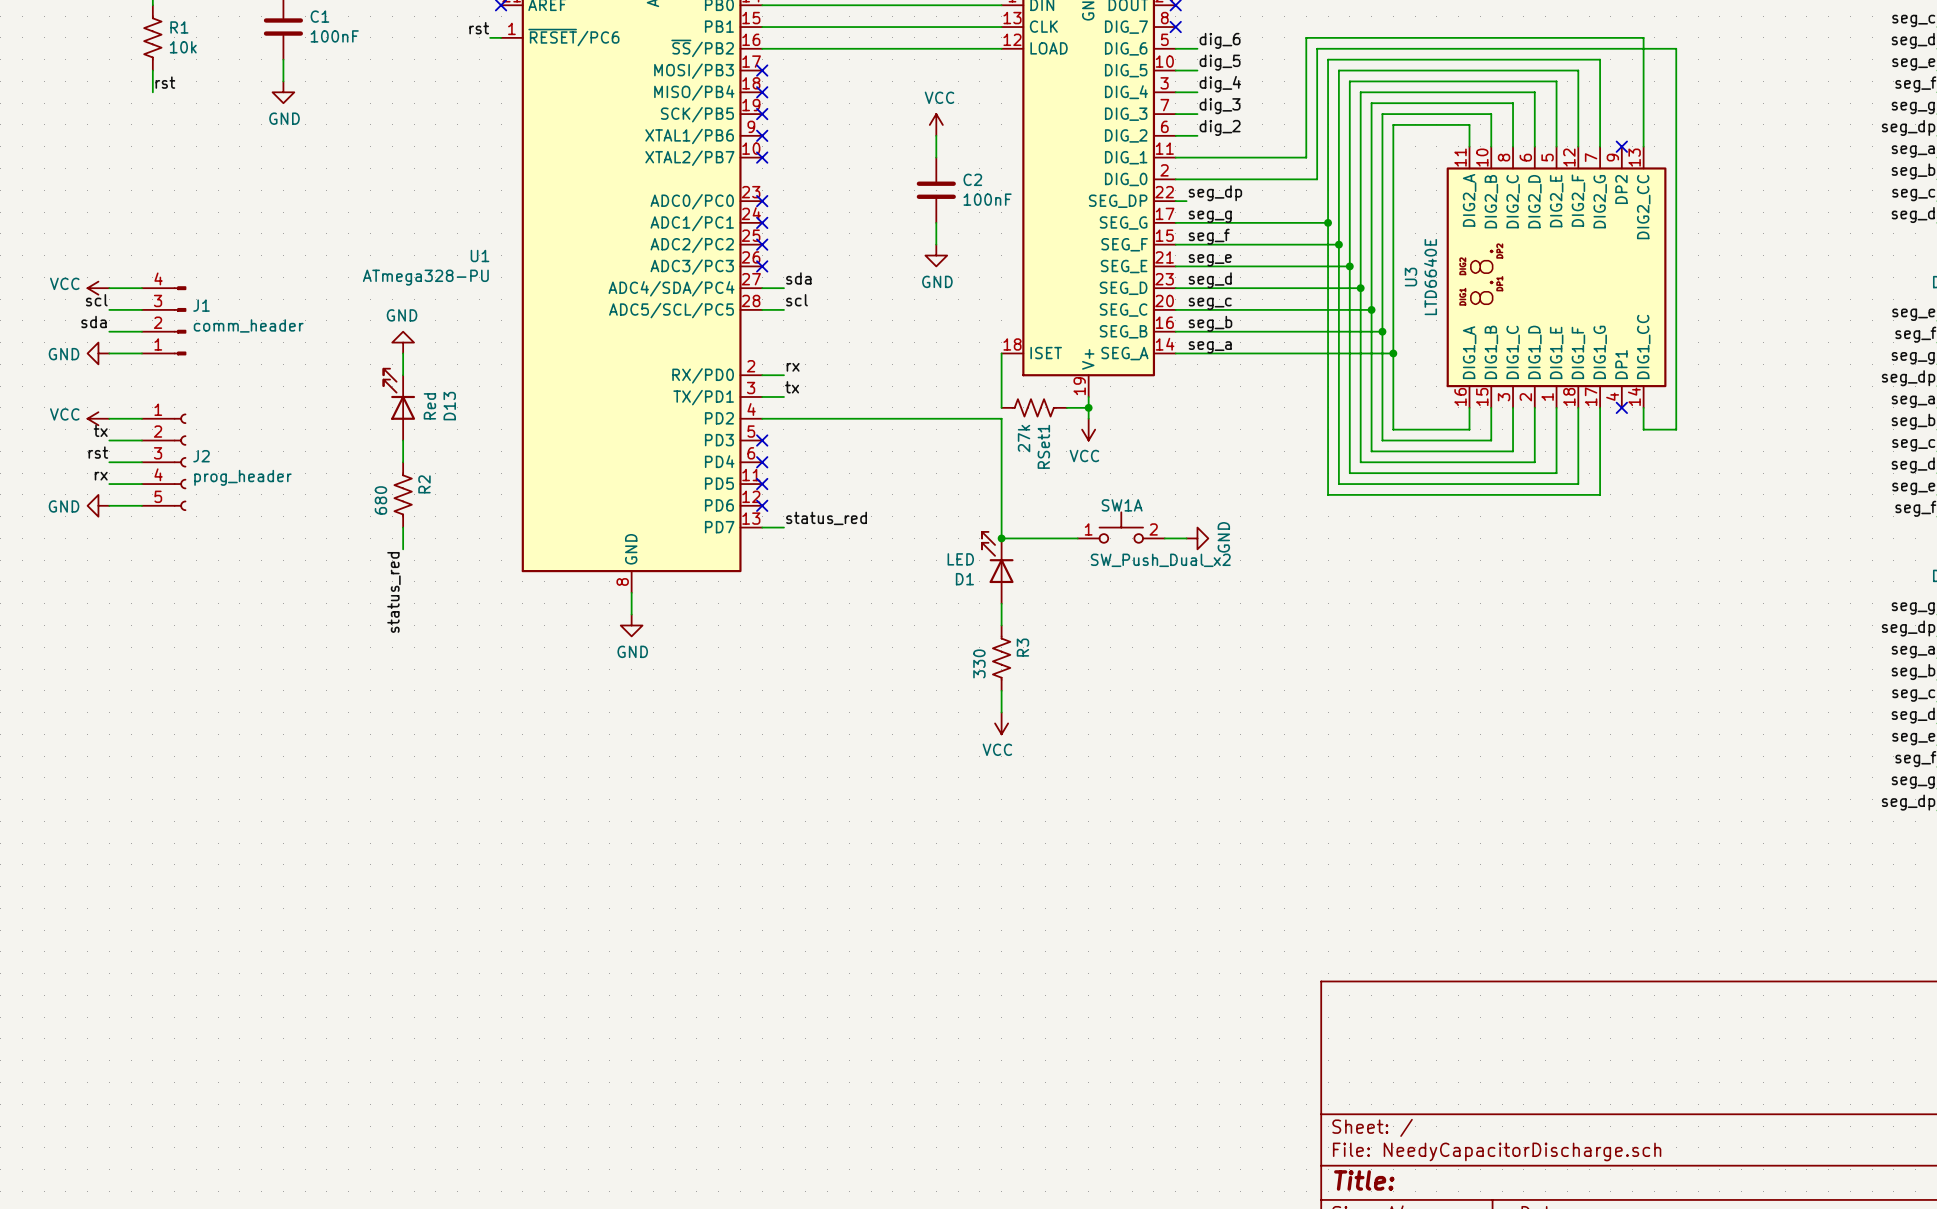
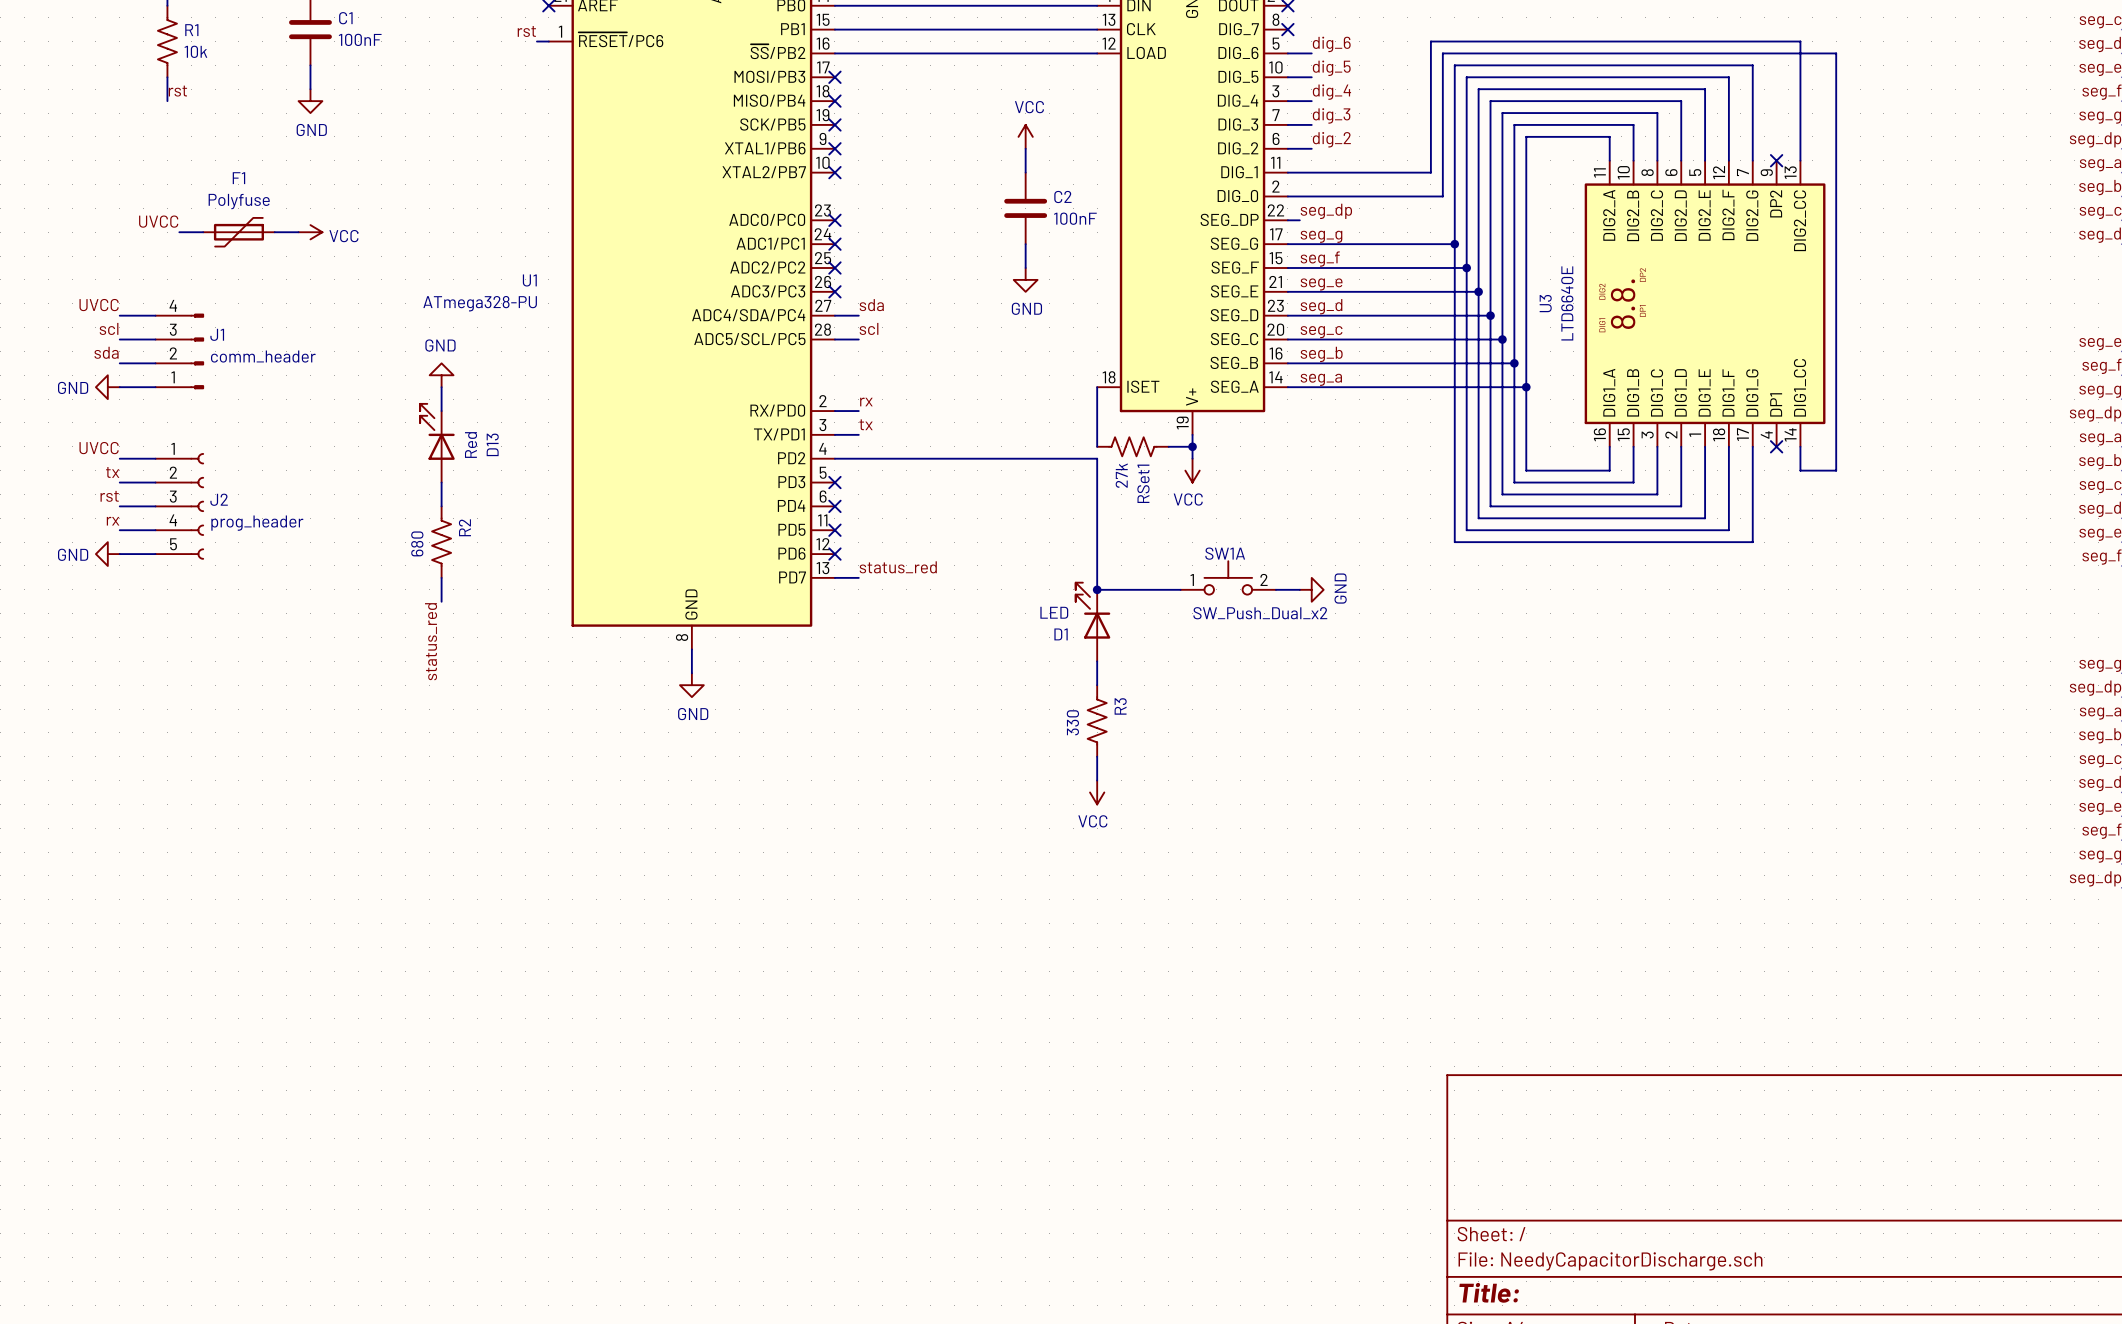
label: none -> UVCC (158, 221)
wire: none -> (179, 232) (203, 232)
F1: none -> Polyfuse (238, 232)
wire: none -> (274, 232) (298, 232)
power symbol: none -> VCC (310, 232)
label: none -> UVCC (99, 305)
power symbol: VCC (98, 288) -> none
label: none -> UVCC (99, 448)
power symbol: VCC (98, 418) -> none

